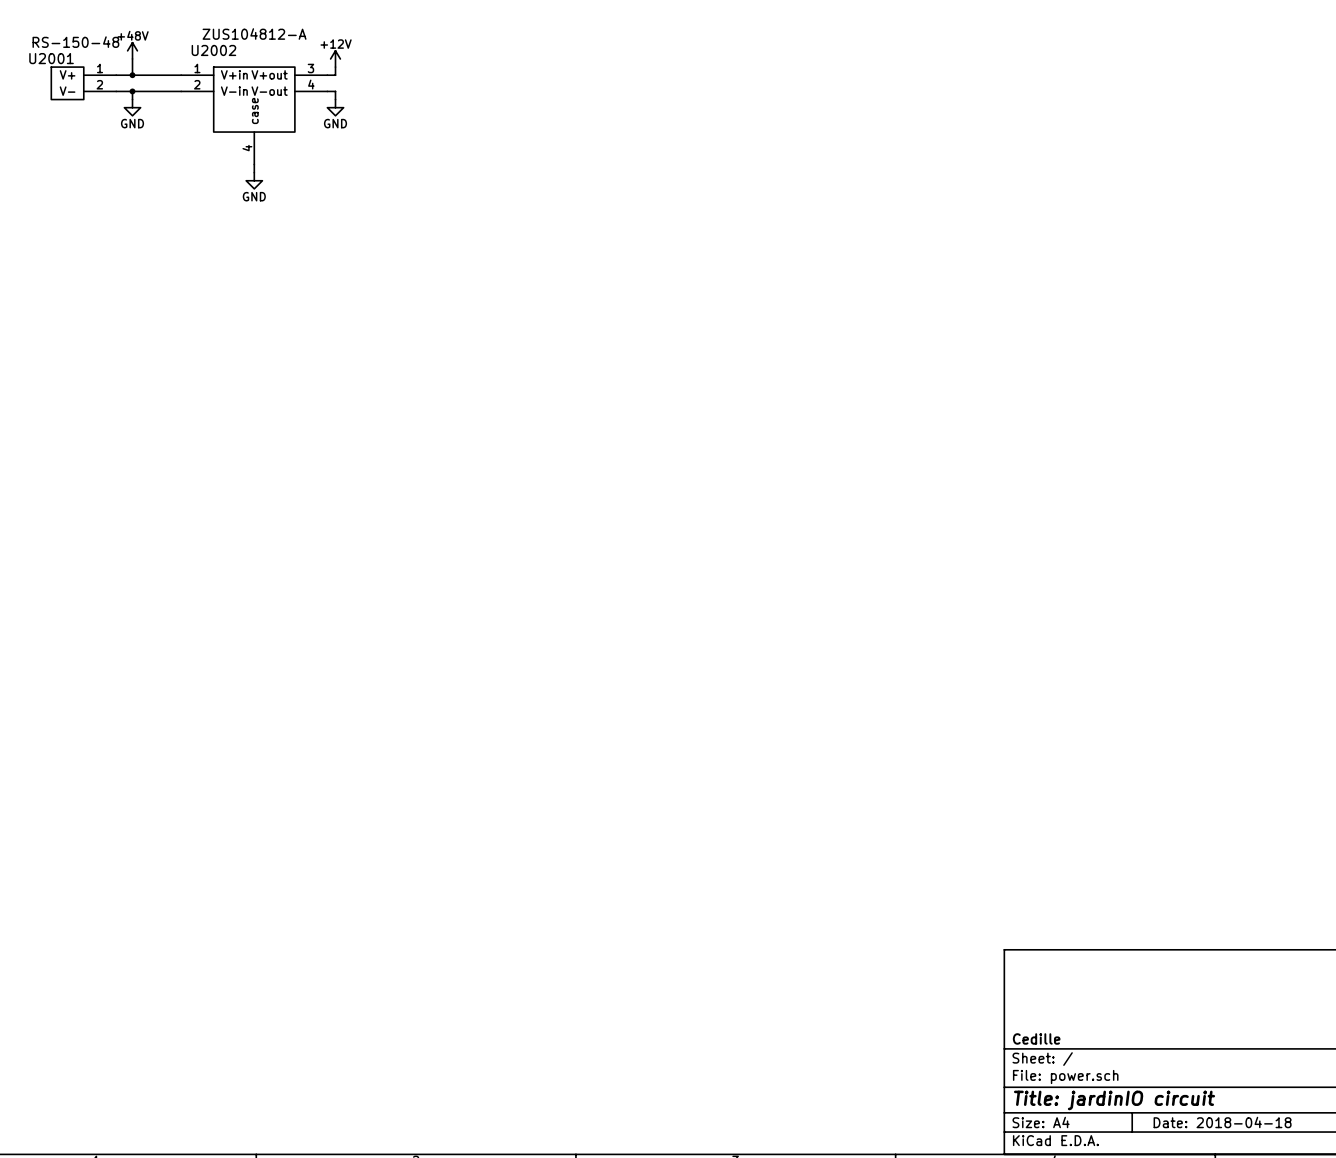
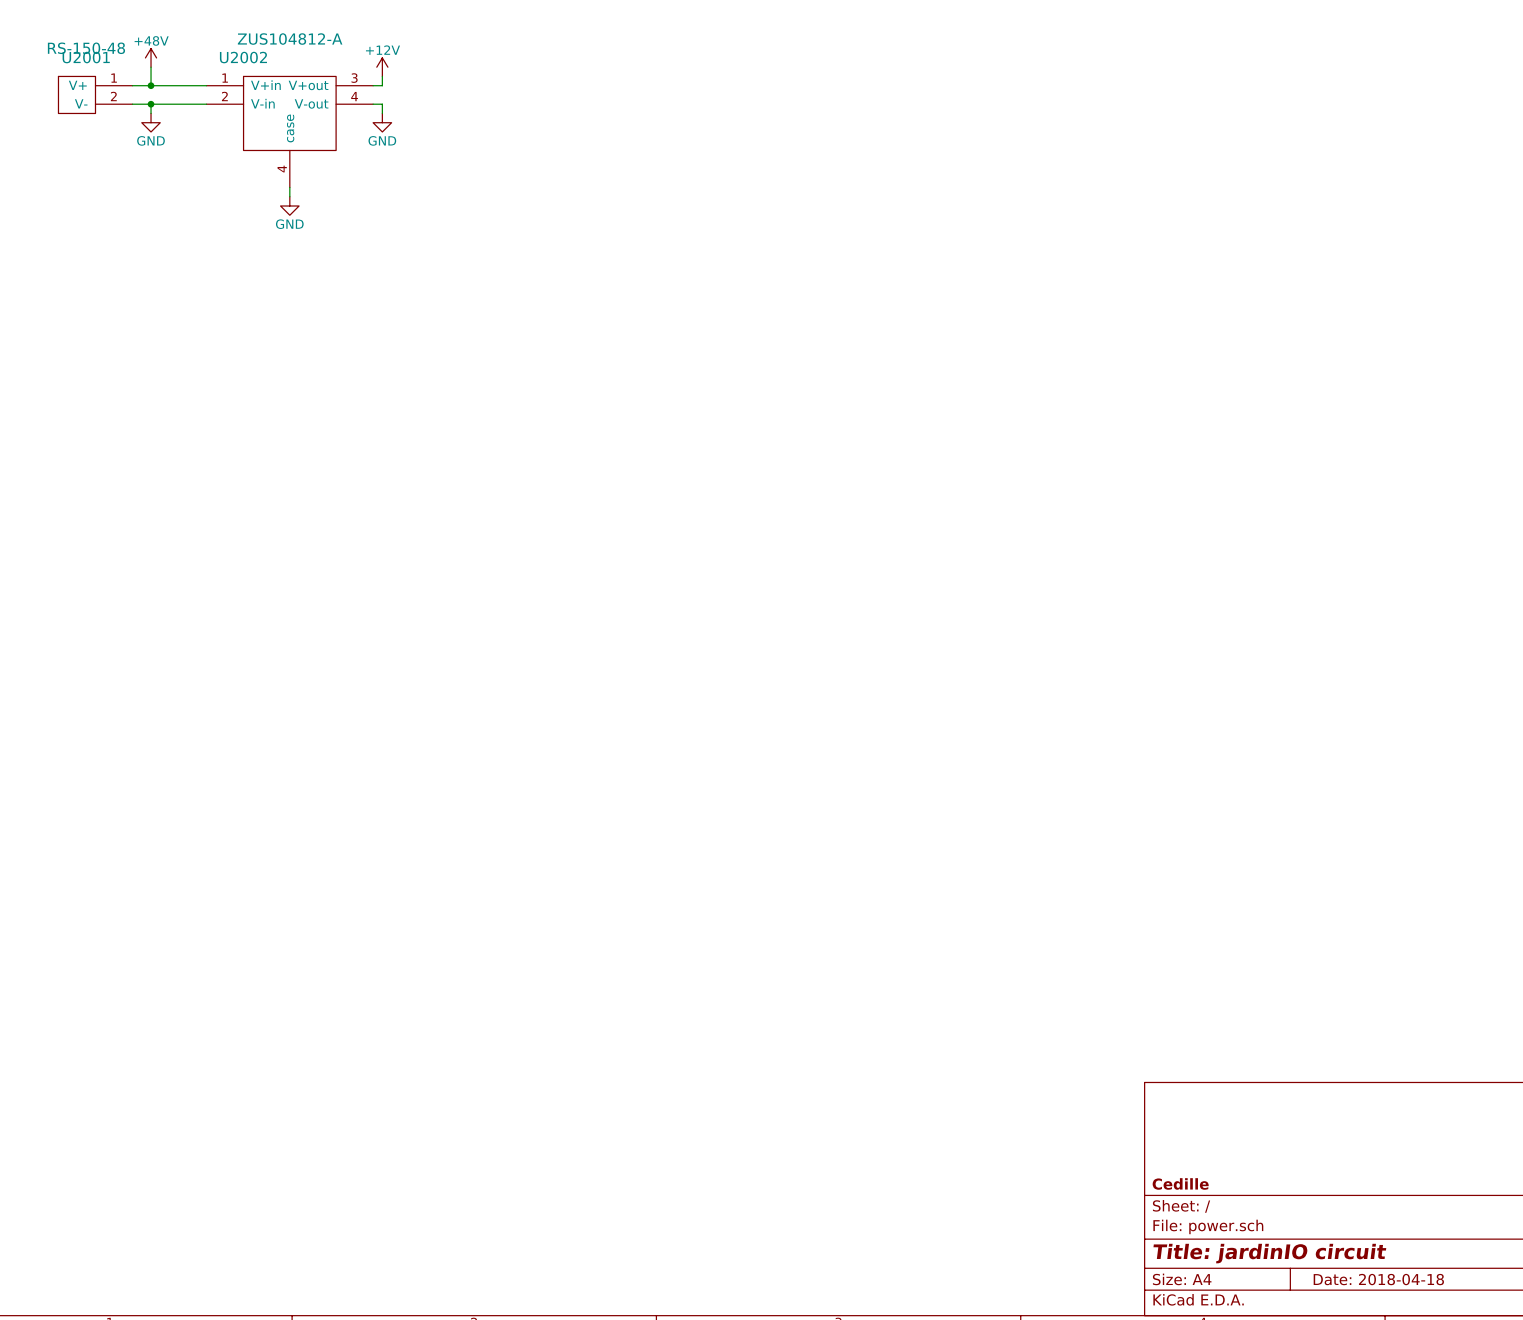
U2001 name position: U2001 (51, 58) -> U2001 (86, 57)

